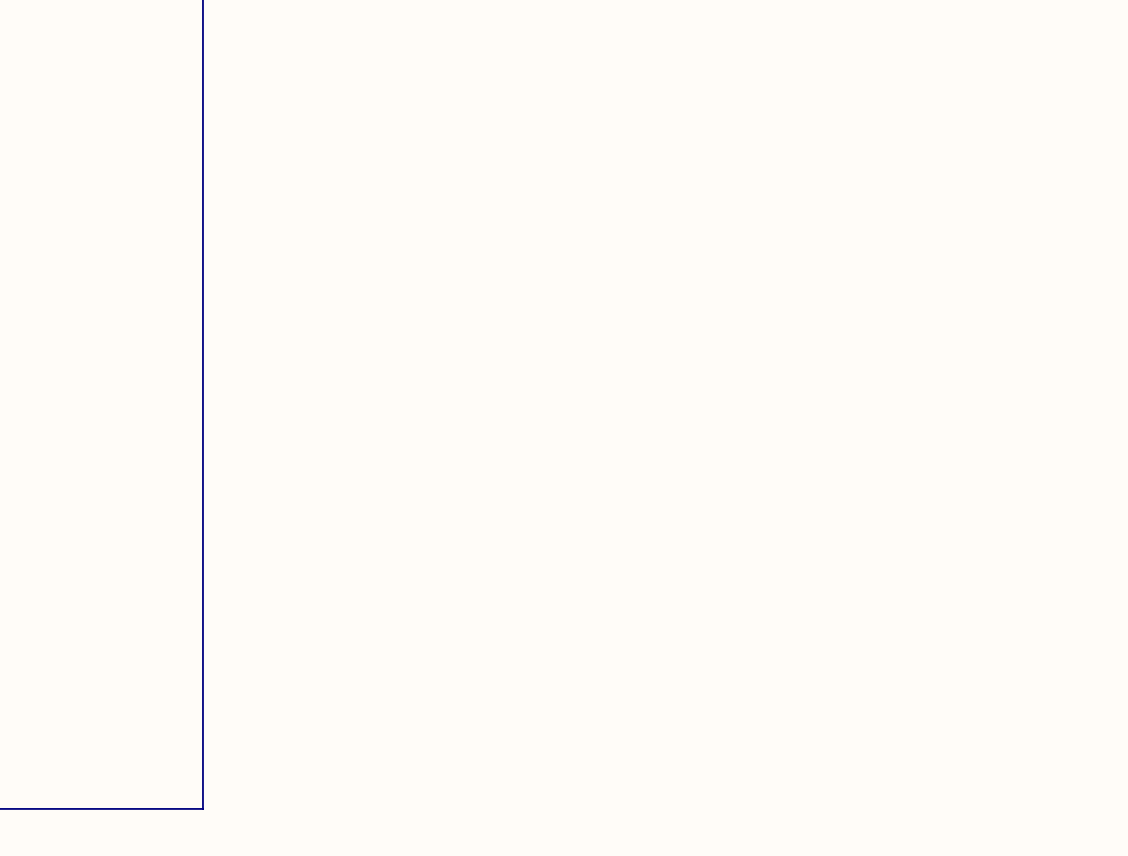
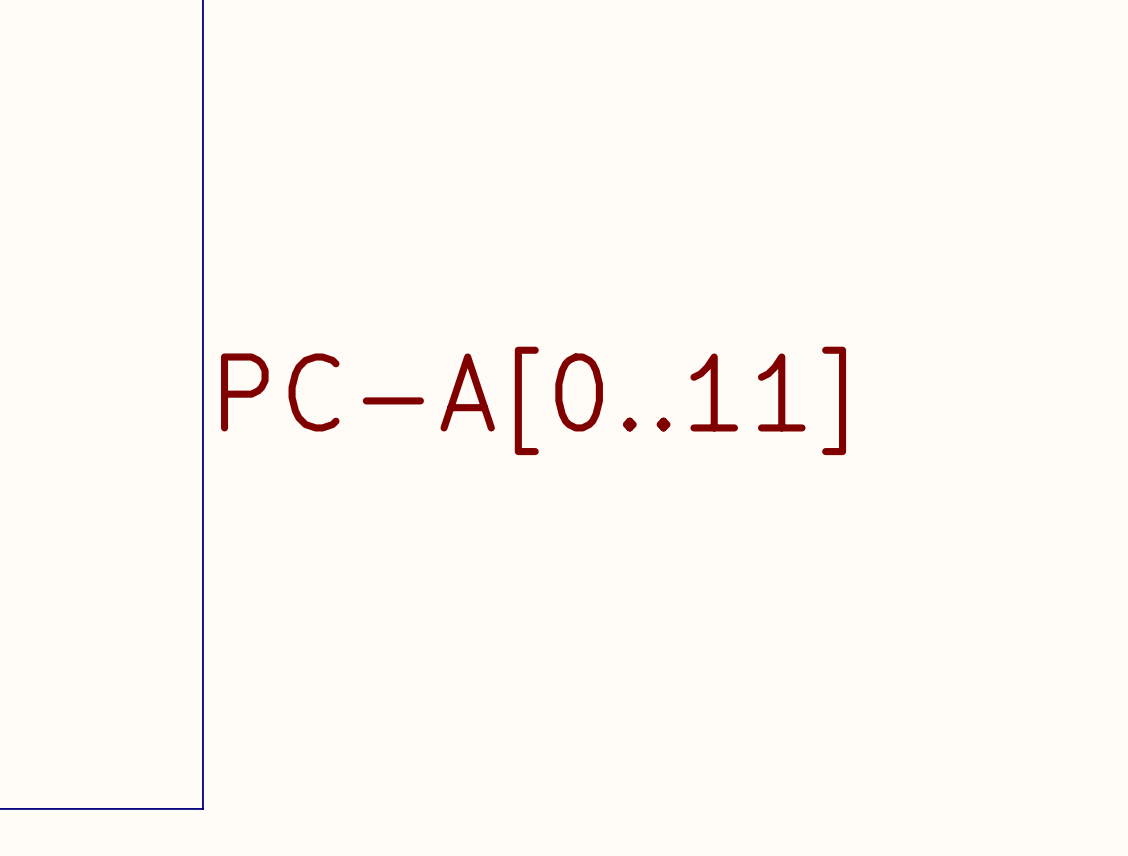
label: none -> PC-A[0..11] (533, 400)

